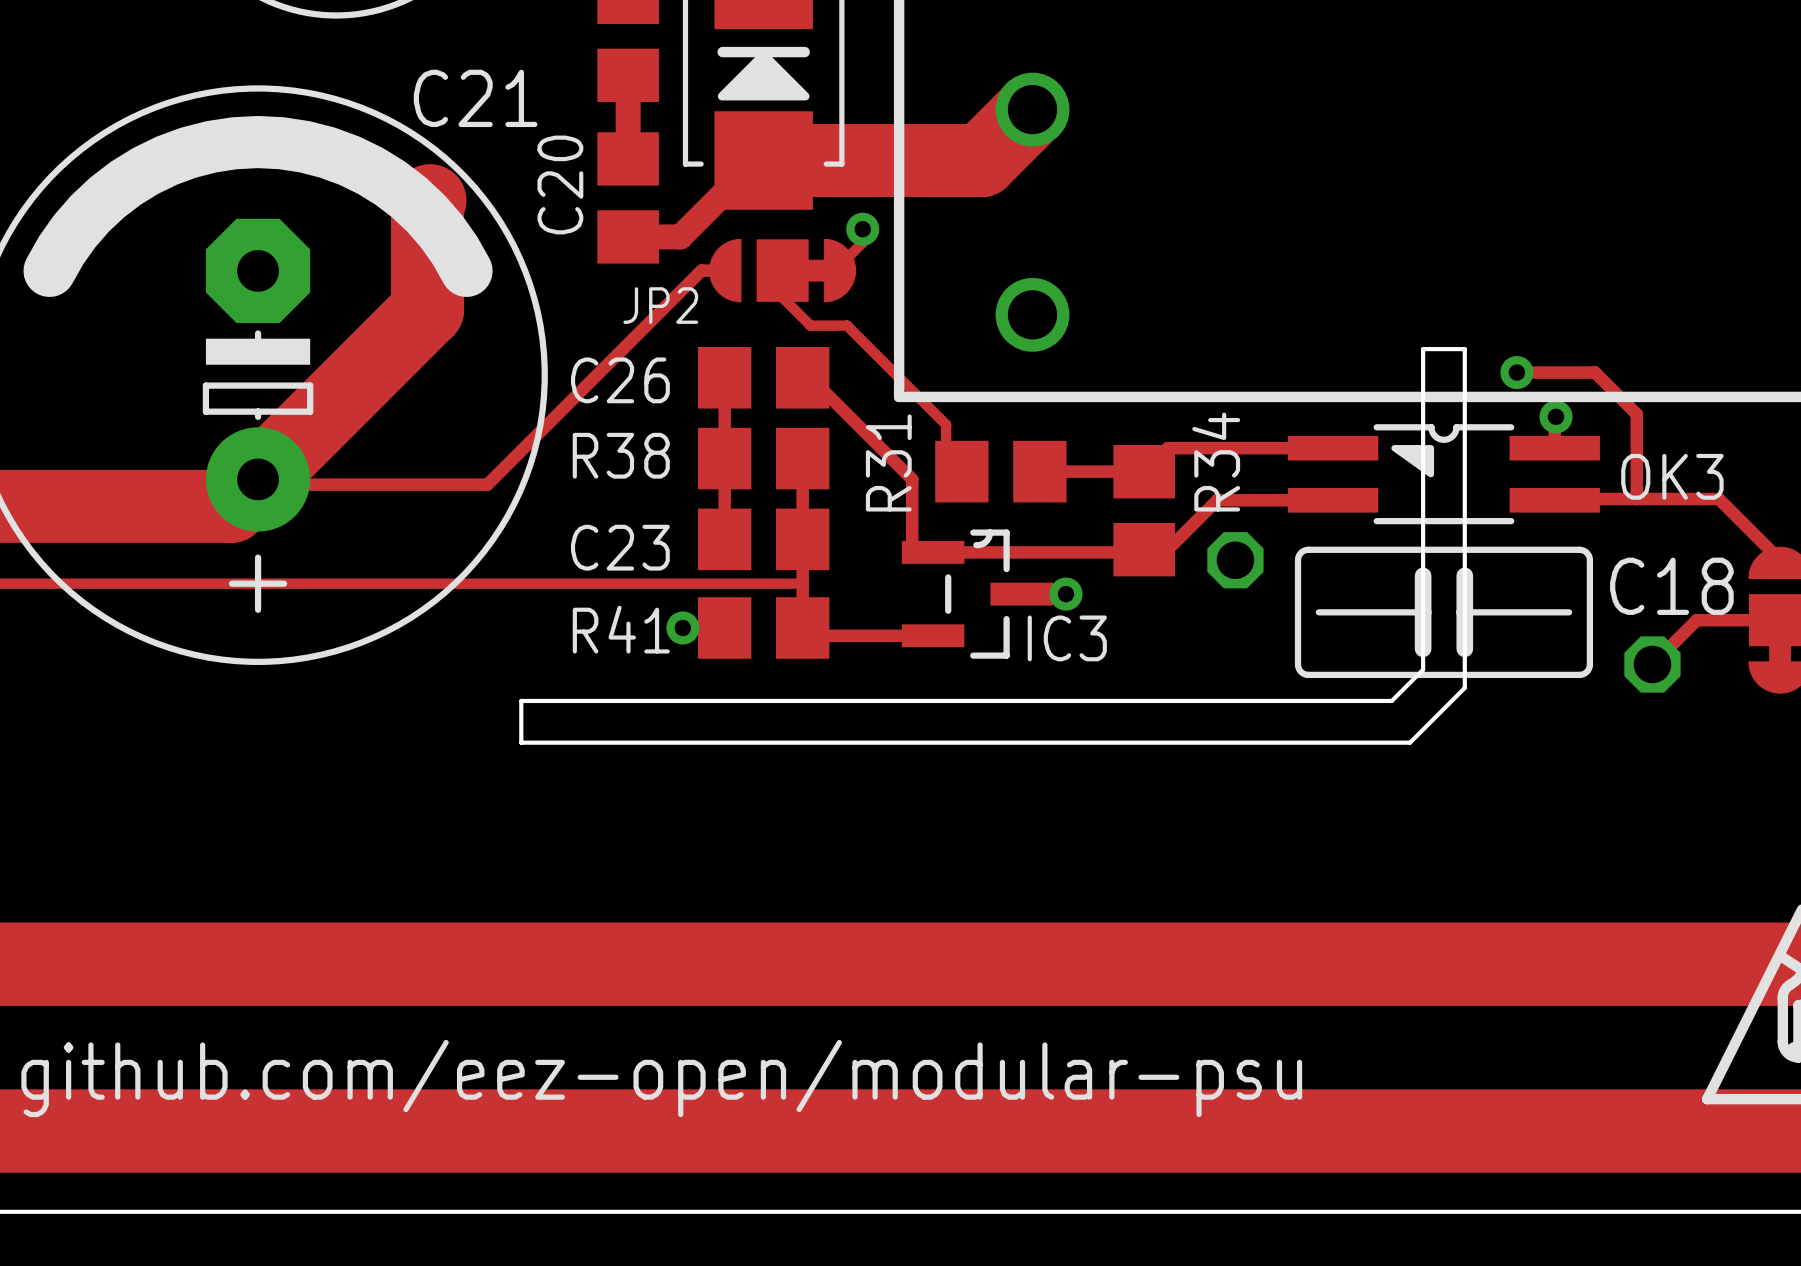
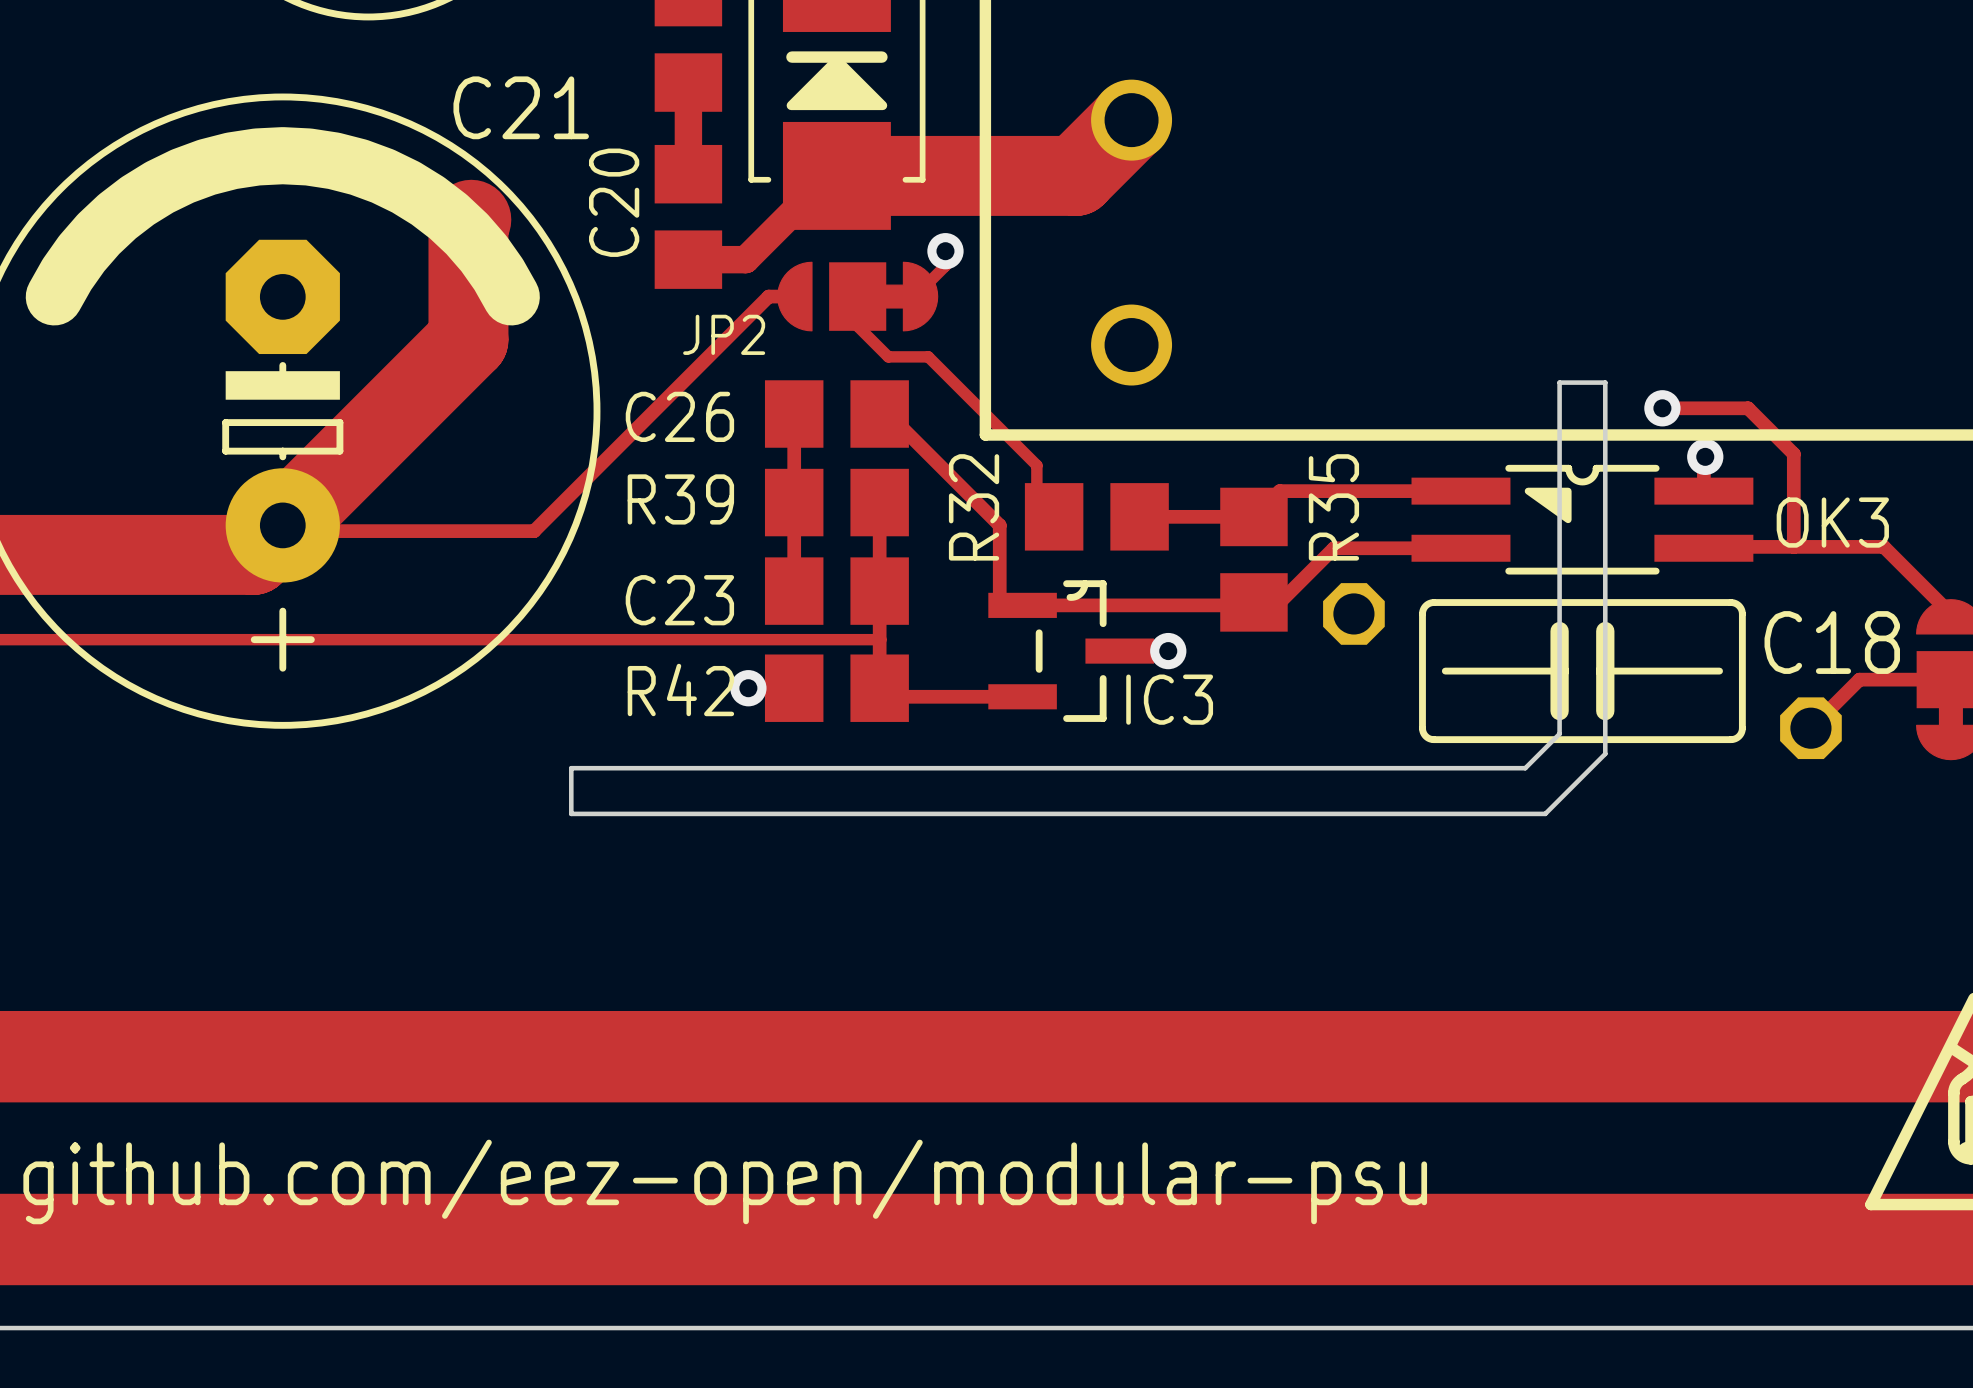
R38 name: R38 (621, 455) -> R39 (680, 499)
R31 name: R31 (888, 462) -> R32 (974, 507)
R34 name: R34 (1216, 462) -> R35 (1333, 507)
R41 name: R41 (621, 629) -> R42 (680, 689)

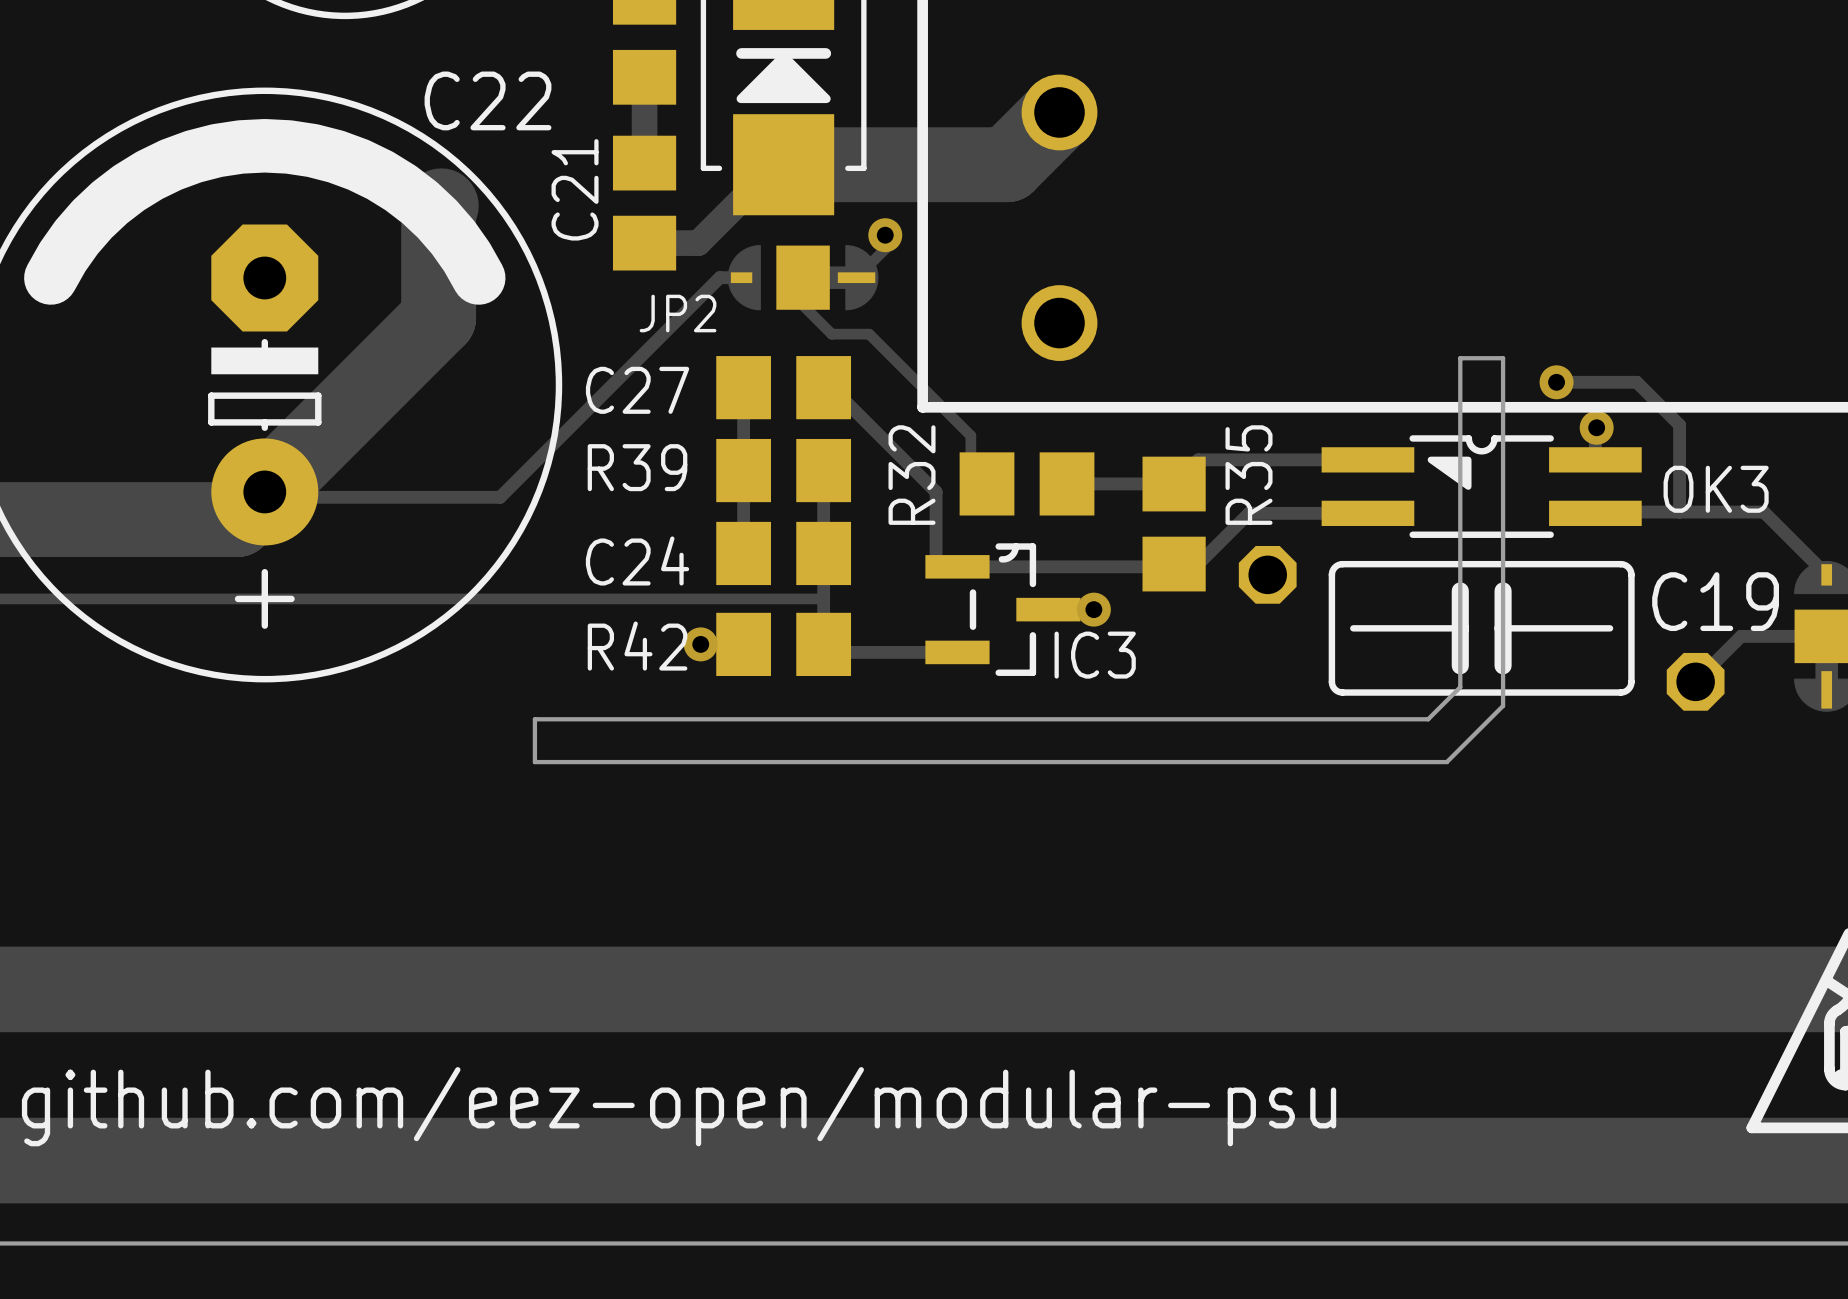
C21 name: C21 (521, 107) -> C22 (488, 100)
C20 name: C20 (614, 202) -> C21 (575, 189)
C26 name: C26 (679, 416) -> C27 (637, 390)
C23 name: C23 (679, 600) -> C24 (637, 560)
C18 name: C18 (1832, 642) -> C19 (1715, 601)

